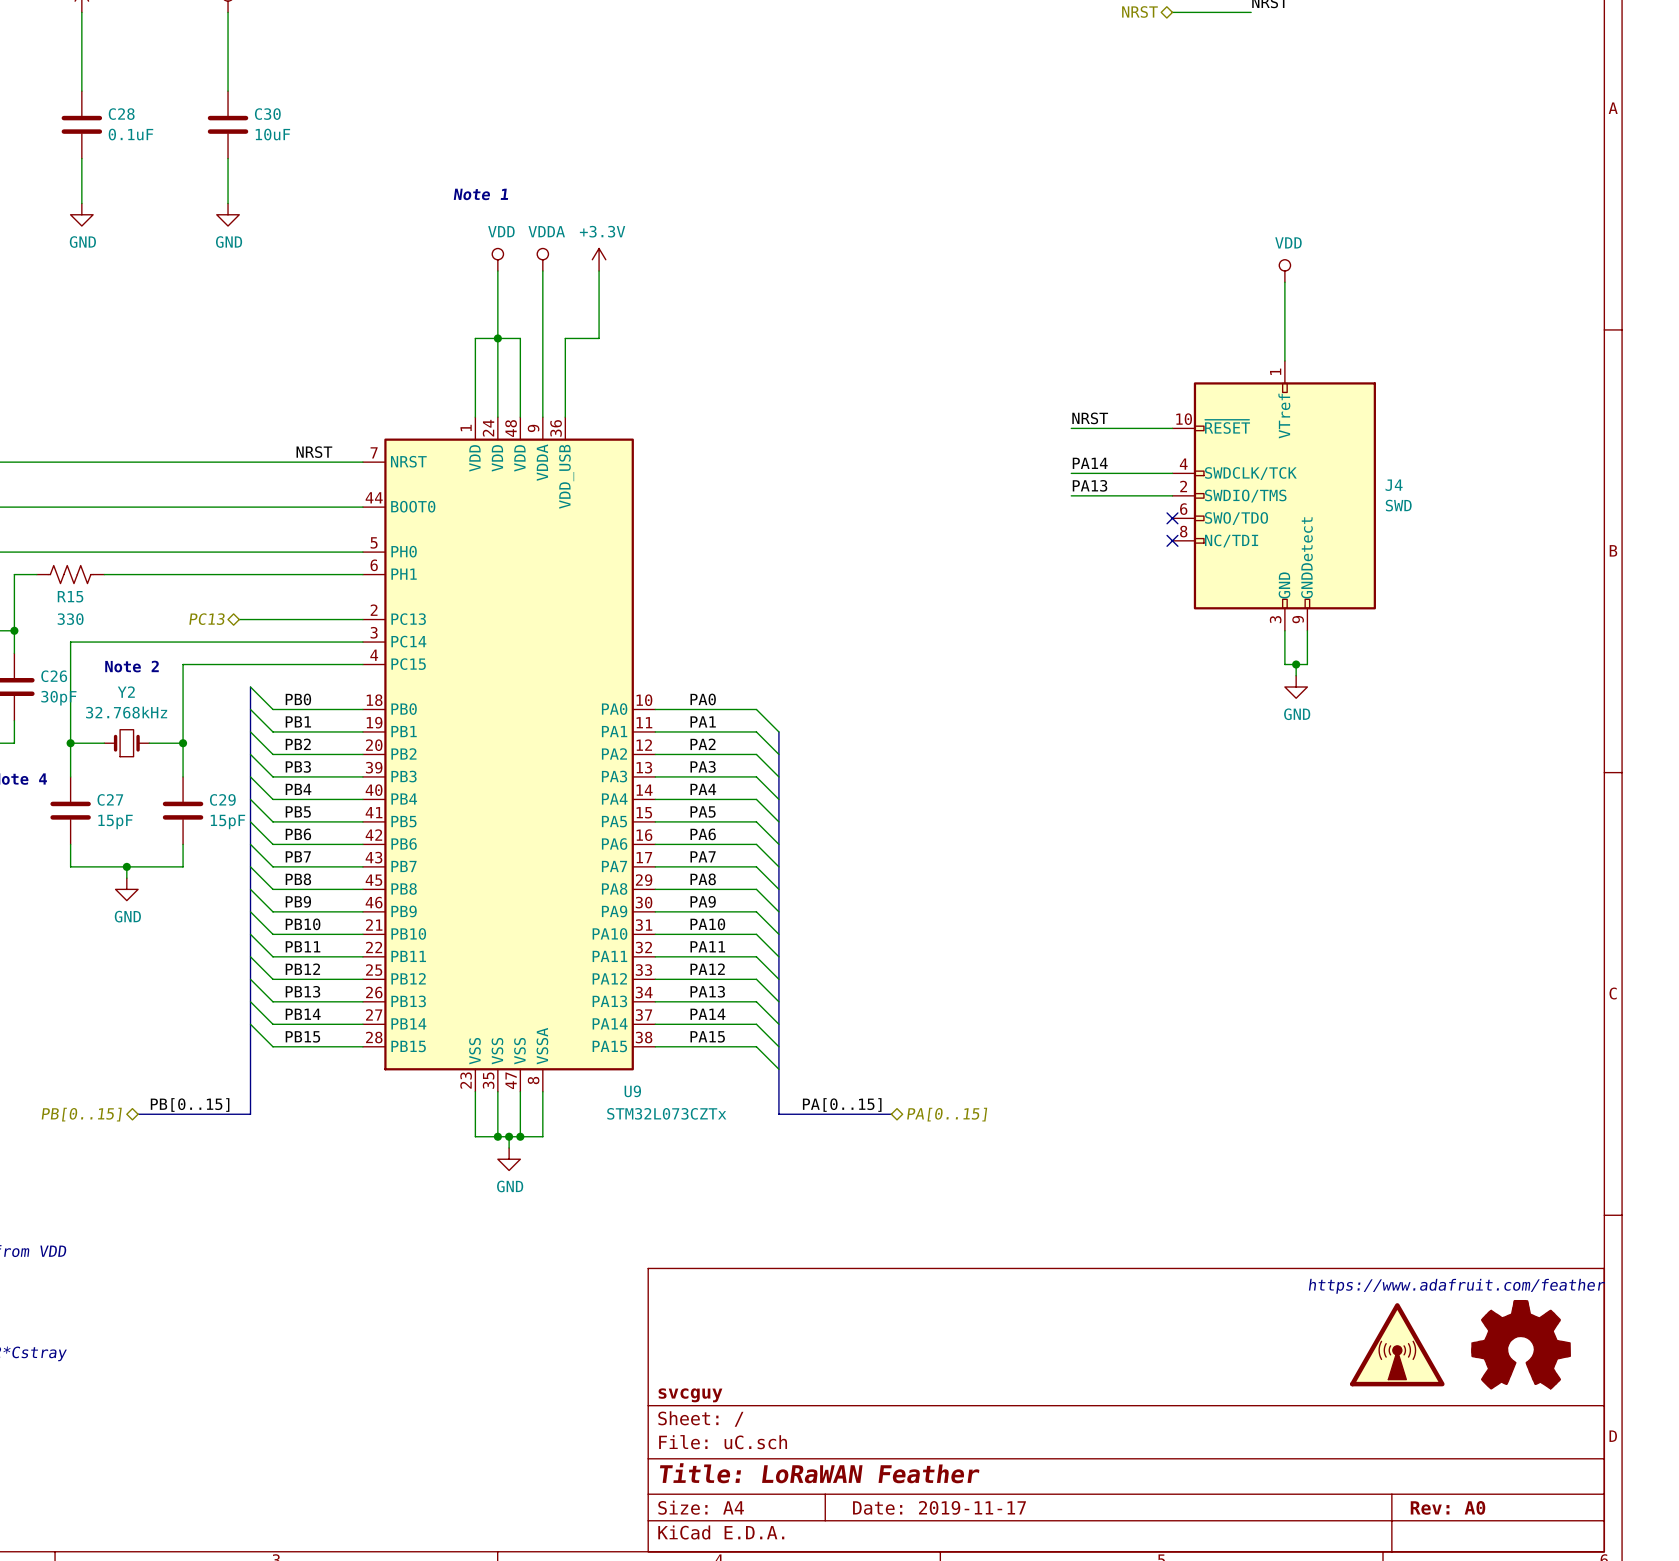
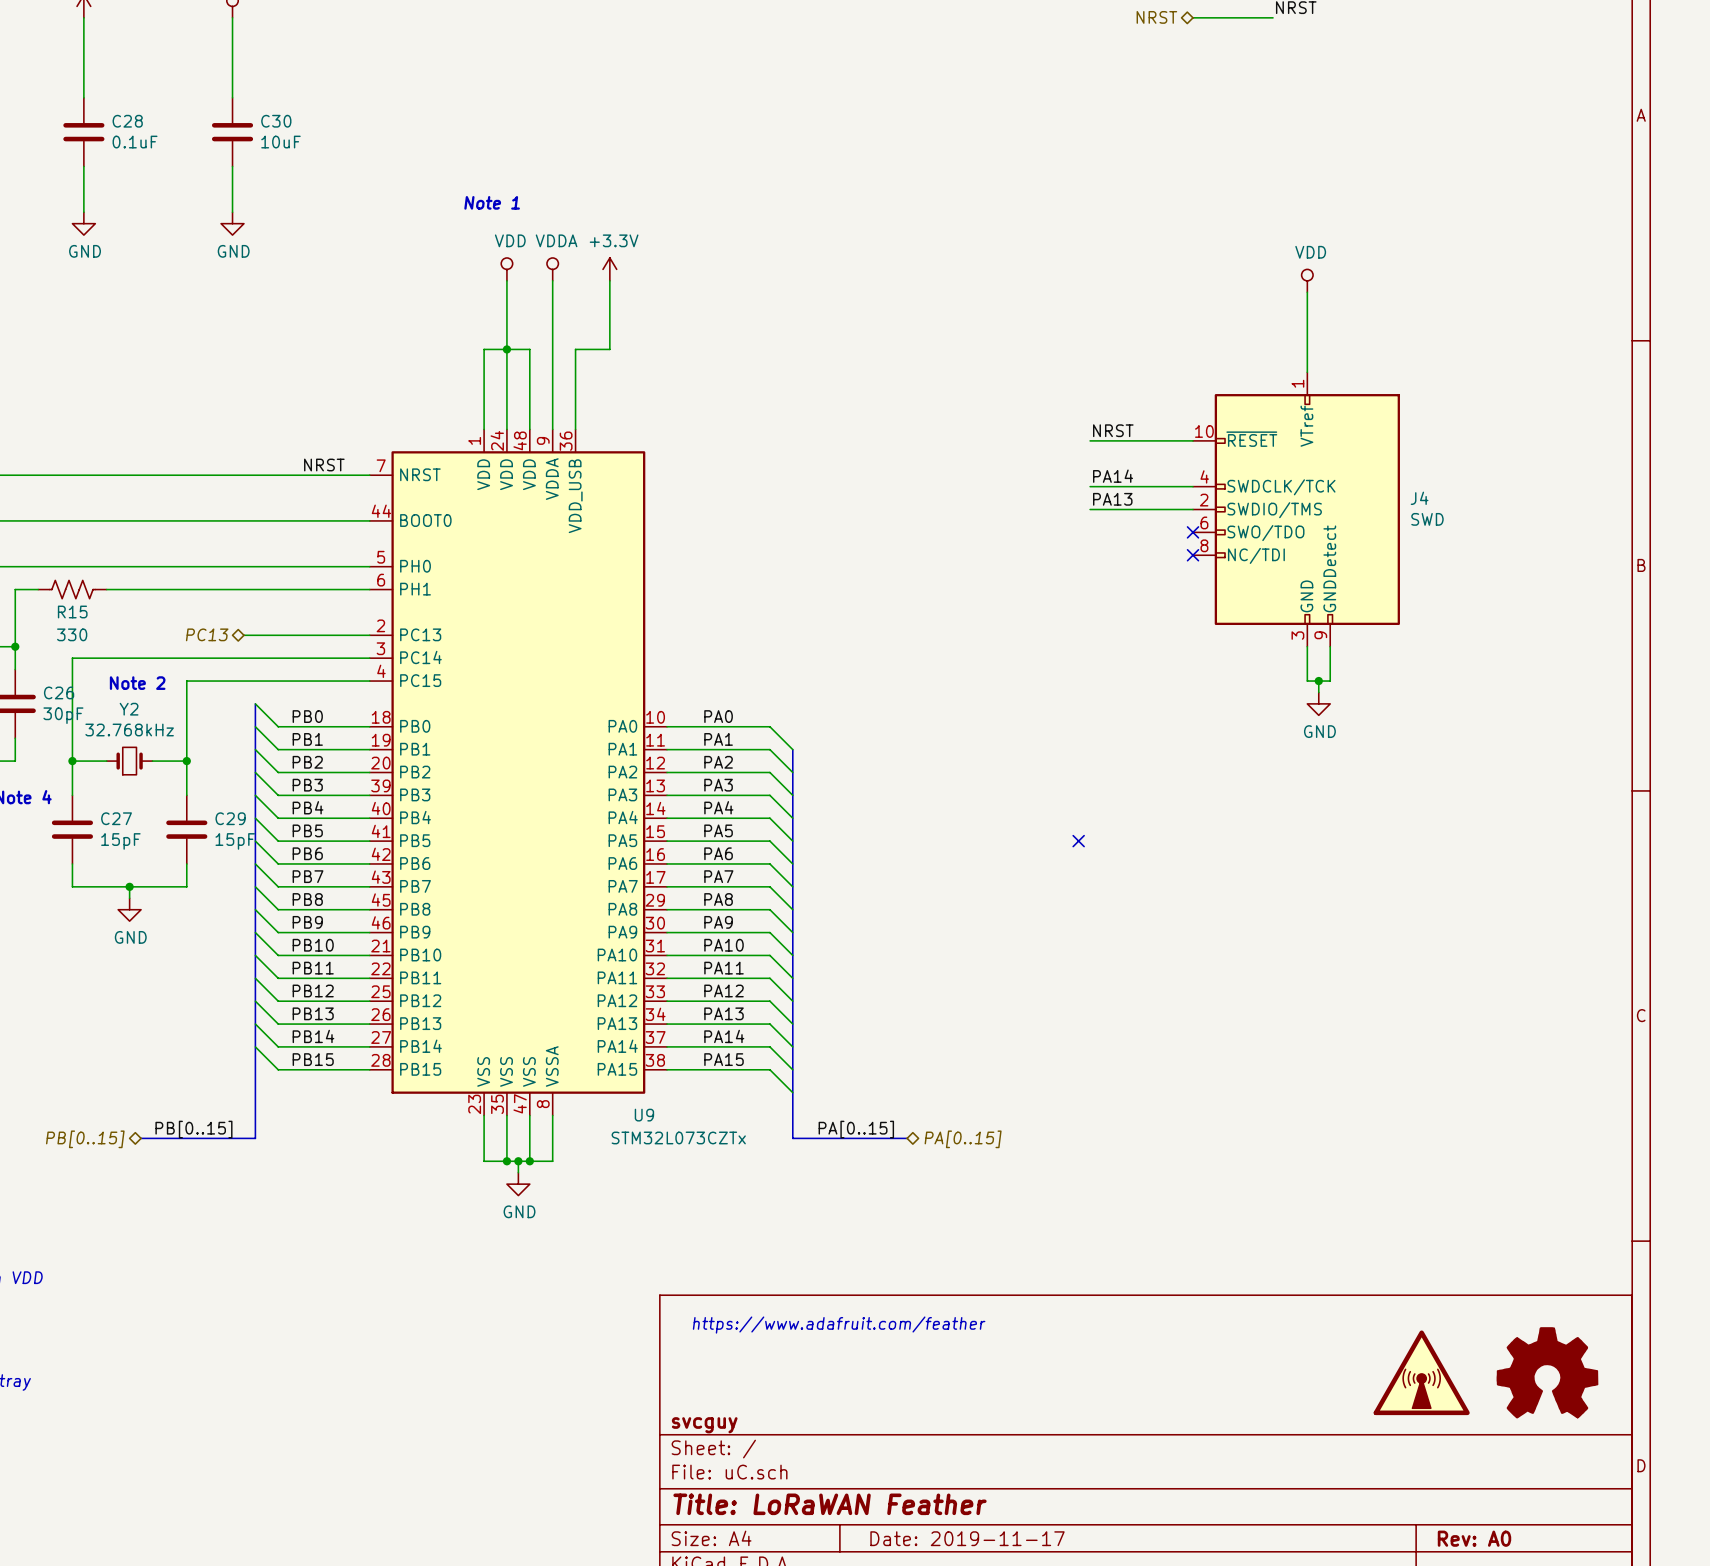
no-connect mark: none -> (1078, 841)
text: https://www.adafruit.com/feather (1456, 1286) -> none
text: none -> https://www.adafruit.com/feather (839, 1325)

